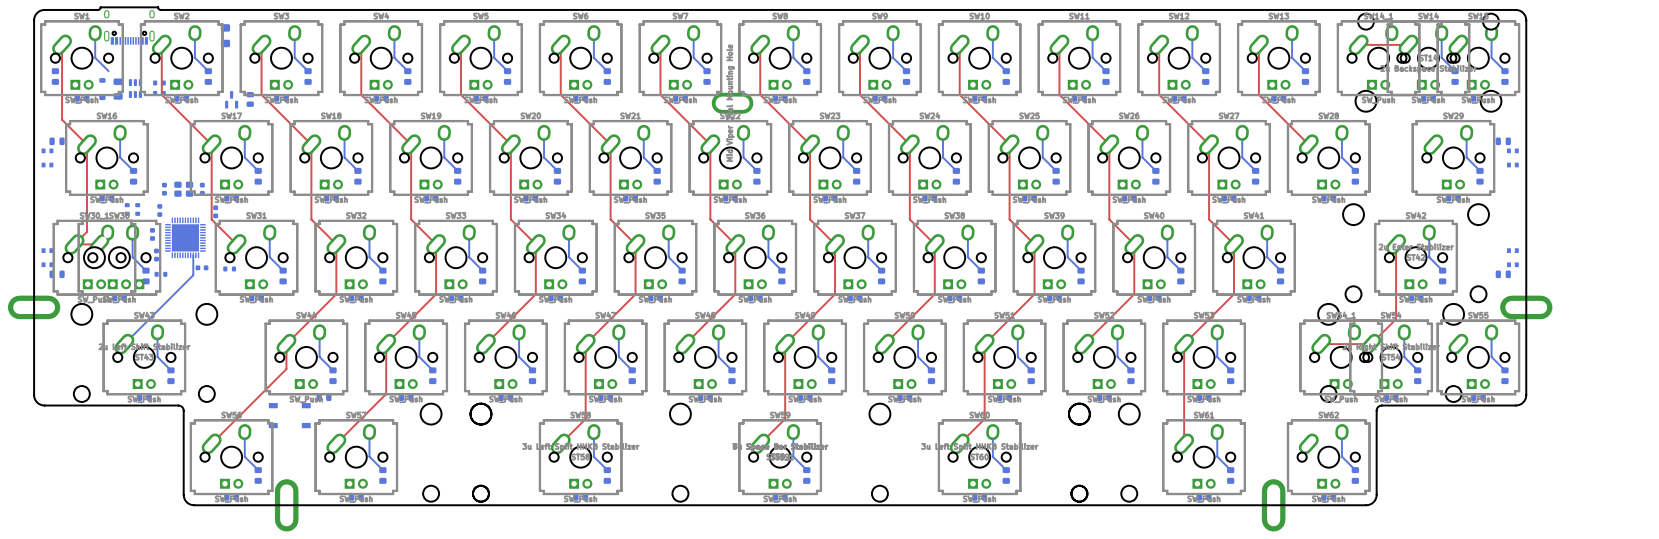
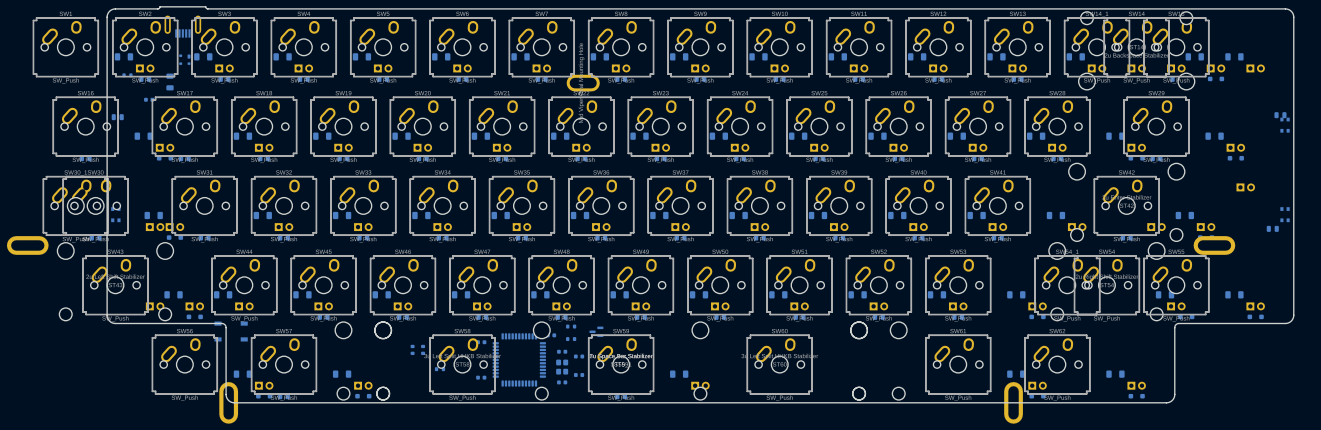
part footprint: [220, 24, 231, 48] -> [164, 15, 202, 38]
part: (129, 27) -> none
bottom track: (95, 33) (95, 57) (108, 71) -> none
bottom track: (194, 33) (194, 57) (208, 71) -> none
bottom track: (294, 33) (294, 57) (308, 71) -> none
bottom track: (394, 33) (394, 57) (407, 71) -> none
bottom track: (494, 33) (494, 57) (507, 71) -> none
bottom track: (593, 33) (593, 57) (607, 71) -> none
bottom track: (693, 33) (693, 57) (707, 71) -> none
bottom track: (793, 33) (793, 57) (806, 71) -> none
bottom track: (893, 33) (893, 57) (906, 71) -> none
bottom track: (992, 33) (992, 57) (1006, 71) -> none
bottom track: (1092, 33) (1092, 57) (1106, 71) -> none
bottom track: (1192, 33) (1192, 57) (1205, 71) -> none
bottom track: (1292, 33) (1292, 57) (1305, 71) -> none
bottom track: (1441, 33) (1441, 57) (1455, 71) -> none
bottom track: (1491, 33) (1491, 57) (1504, 71) -> none
top track: (62, 44) (62, 119) (86, 144) (86, 231) (74, 244) (99, 244) -> none
top track: (161, 44) (161, 94) (211, 144) (211, 219) (236, 244) -> none
top track: (261, 44) (261, 94) (311, 144) (311, 219) (336, 244) (336, 294) (286, 344) (286, 369) (211, 443) -> none
top track: (361, 44) (361, 94) (411, 144) (411, 219) (436, 244) (436, 294) (386, 344) (386, 393) (336, 443) -> none
top track: (461, 44) (461, 94) (510, 144) (510, 219) (535, 244) (535, 294) (485, 344) -> none
top track: (560, 44) (560, 94) (610, 144) (610, 219) (635, 244) (635, 294) (585, 344) (585, 418) (560, 443) -> none
top track: (660, 44) (660, 94) (710, 144) (710, 219) (735, 244) (735, 294) (685, 344) -> none
top track: (760, 44) (760, 94) (810, 144) (810, 219) (835, 244) (835, 294) (785, 344) (785, 418) (760, 443) -> none
top track: (859, 44) (859, 94) (909, 144) (909, 219) (934, 244) (934, 294) (884, 344) -> none
top track: (959, 44) (959, 94) (1009, 144) (1009, 219) (1034, 244) (1034, 294) (984, 344) (984, 418) (959, 443) -> none
top track: (1059, 44) (1059, 94) (1109, 144) (1109, 219) (1134, 244) (1134, 294) (1084, 344) -> none
top track: (1159, 44) (1159, 94) (1209, 144) (1209, 219) (1234, 244) (1234, 294) (1184, 344) (1184, 443) -> none
top track: (1258, 44) (1258, 94) (1308, 144) -> none
top track: (1358, 44) (1408, 44) -> none
part: none -> (123, 56)
part: none -> (203, 56)
part: none -> (282, 56)
part: none -> (361, 56)
part: none -> (441, 56)
part: none -> (520, 56)
part: none -> (599, 56)
part: none -> (679, 56)
part: none -> (758, 56)
part: none -> (837, 56)
part: none -> (917, 56)
part: none -> (996, 56)
part: none -> (1075, 56)
part: none -> (1194, 56)
part: none -> (1234, 56)
part: none -> (184, 59)
part: (55, 76) -> none
part: (208, 76) -> none
part: (308, 76) -> none
part: (407, 76) -> none
part: (507, 76) -> none
part: (607, 76) -> none
part: (707, 76) -> none
part: (806, 76) -> none
part: (906, 76) -> none
part: (1006, 76) -> none
part: (1106, 76) -> none
part: (1205, 76) -> none
part: (1305, 76) -> none
part: (1455, 76) -> none
part: (1504, 76) -> none
part: (159, 82) -> none
part: (82, 84) -> none
part: none -> (1216, 68)
part: none -> (1255, 68)
part: (135, 88) -> none
part: (102, 89) -> none
part position: (118, 89) -> (169, 81)
part: none -> (1216, 78)
part: (82, 98) -> none
part: (1428, 98) -> none
part: (231, 99) -> none
part: (250, 99) -> none
part: none -> (149, 99)
bottom track: (120, 132) (120, 157) (133, 170) -> none
bottom track: (244, 132) (244, 157) (258, 170) -> none
bottom track: (344, 132) (344, 157) (357, 170) -> none
bottom track: (444, 132) (444, 157) (457, 170) -> none
bottom track: (544, 132) (544, 157) (557, 170) -> none
bottom track: (643, 132) (643, 157) (657, 170) -> none
bottom track: (743, 132) (743, 157) (756, 170) -> none
bottom track: (843, 132) (843, 157) (856, 170) -> none
bottom track: (942, 132) (942, 157) (956, 170) -> none
bottom track: (1042, 132) (1042, 157) (1056, 170) -> none
bottom track: (1142, 132) (1142, 157) (1155, 170) -> none
bottom track: (1242, 132) (1242, 157) (1255, 170) -> none
bottom track: (1341, 132) (1341, 157) (1355, 170) -> none
bottom track: (1466, 132) (1466, 157) (1480, 170) -> none
part: (57, 141) -> none
part: (1503, 141) -> none
part: none -> (1280, 115)
part: none -> (117, 117)
part: none -> (1285, 125)
part: (47, 157) -> none
part: (1512, 157) -> none
part: none -> (143, 136)
part: none -> (242, 136)
part: none -> (322, 136)
part: none -> (401, 136)
part: none -> (480, 136)
part: none -> (560, 136)
part: none -> (639, 136)
part: none -> (718, 136)
part: none -> (798, 136)
part: none -> (877, 136)
part: none -> (956, 136)
part: none -> (1036, 136)
part: none -> (1115, 136)
part: none -> (1214, 136)
part: (133, 176) -> none
part: (258, 176) -> none
part: (357, 176) -> none
part: (457, 176) -> none
part: (557, 176) -> none
part: (657, 176) -> none
part: (756, 176) -> none
part: (856, 176) -> none
part: (956, 176) -> none
part: (1056, 176) -> none
part: (1155, 176) -> none
part: (1255, 176) -> none
part: (1355, 176) -> none
part: (1480, 176) -> none
part: (106, 184) -> none
part position: (231, 184) -> (165, 147)
part position: (1453, 184) -> (1136, 147)
part: none -> (1235, 147)
part: (164, 189) -> none
part: (183, 189) -> none
part: (202, 189) -> none
part: none -> (165, 158)
part: none -> (1136, 158)
part: none -> (1235, 158)
part: (127, 209) -> none
part: (137, 209) -> none
part: (159, 210) -> none
part: (215, 211) -> none
bottom track: (132, 232) (132, 257) (146, 270) -> none
bottom track: (269, 232) (269, 257) (283, 270) -> none
bottom track: (369, 232) (369, 257) (382, 270) -> none
bottom track: (469, 232) (469, 257) (482, 270) -> none
bottom track: (568, 232) (568, 257) (582, 270) -> none
bottom track: (668, 232) (668, 257) (682, 270) -> none
bottom track: (768, 232) (768, 257) (781, 270) -> none
bottom track: (868, 232) (868, 257) (881, 270) -> none
bottom track: (967, 232) (967, 257) (981, 270) -> none
bottom track: (1067, 232) (1067, 257) (1081, 270) -> none
bottom track: (1167, 232) (1167, 257) (1180, 270) -> none
bottom track: (1267, 232) (1267, 257) (1280, 270) -> none
bottom track: (1429, 232) (1429, 257) (1442, 270) -> none
part: (152, 234) -> none
part: none -> (1245, 187)
part: (185, 237) -> none
top track: (1396, 244) (1396, 319) (1371, 344) (1321, 344) -> none
part: (156, 255) -> none
bottom track: (193, 255) (193, 275) (124, 344) -> none
drawing position: (780, 256) -> (700, 204)
part: (47, 257) -> none
part: (1512, 257) -> none
part: (202, 267) -> none
part: none -> (115, 214)
part: (229, 268) -> none
part: none -> (1285, 214)
part: none -> (153, 215)
part: none -> (262, 215)
part: none -> (342, 215)
part: none -> (421, 215)
part: none -> (500, 215)
part: none -> (580, 215)
part: none -> (659, 215)
part: none -> (738, 215)
part: none -> (818, 215)
part: none -> (897, 215)
part: none -> (976, 215)
part: none -> (1055, 215)
part: none -> (1184, 215)
part: (57, 274) -> none
part: (160, 274) -> none
part: (1503, 274) -> none
part: (146, 276) -> none
part: (283, 276) -> none
part: (382, 276) -> none
part: (482, 276) -> none
part: (582, 276) -> none
part: (682, 276) -> none
part: (781, 276) -> none
part: (881, 276) -> none
part: (981, 276) -> none
part: (1081, 276) -> none
part: (1180, 276) -> none
part: (1280, 276) -> none
part: (1442, 276) -> none
part: (94, 284) -> none
part: (119, 284) -> none
part: (139, 284) -> none
part: none -> (155, 227)
part: none -> (174, 227)
part: (256, 284) -> none
part: none -> (1077, 227)
part: (1416, 284) -> none
part: none -> (1156, 227)
part: none -> (1206, 227)
part: none -> (1272, 228)
part: none -> (174, 237)
part: none -> (1206, 237)
bottom track: (157, 332) (157, 356) (170, 370) -> none
bottom track: (319, 332) (319, 356) (333, 370) -> none
bottom track: (419, 332) (419, 356) (432, 370) -> none
bottom track: (519, 332) (519, 356) (532, 370) -> none
bottom track: (618, 332) (618, 356) (632, 370) -> none
bottom track: (718, 332) (718, 356) (731, 370) -> none
bottom track: (818, 332) (818, 356) (831, 370) -> none
bottom track: (918, 332) (918, 356) (931, 370) -> none
bottom track: (1017, 332) (1017, 356) (1031, 370) -> none
bottom track: (1117, 332) (1117, 356) (1130, 370) -> none
bottom track: (1217, 332) (1217, 356) (1230, 370) -> none
bottom track: (1404, 332) (1404, 356) (1417, 370) -> none
bottom track: (1491, 332) (1491, 356) (1504, 370) -> none
part: none -> (173, 294)
part: none -> (223, 294)
part: none -> (302, 294)
part: none -> (381, 294)
part: none -> (461, 294)
part: none -> (540, 294)
part: none -> (619, 294)
part: none -> (699, 294)
part: none -> (778, 294)
part: none -> (857, 294)
part: none -> (936, 294)
part: none -> (1016, 294)
part: none -> (1165, 294)
part: none -> (1234, 294)
part: (170, 375) -> none
part: (333, 375) -> none
part: (432, 375) -> none
part: (532, 375) -> none
part: (632, 375) -> none
part: (731, 375) -> none
part: (831, 375) -> none
part: (931, 375) -> none
part: (1031, 375) -> none
part: (1130, 375) -> none
part: (1230, 375) -> none
part: (1417, 375) -> none
part: (1504, 375) -> none
part: (144, 384) -> none
part: none -> (155, 306)
part: none -> (194, 306)
part position: (1341, 384) -> (1037, 306)
part: (1391, 384) -> none
part: none -> (1255, 306)
part: (144, 397) -> none
part: none -> (194, 316)
part: (324, 397) -> none
part: none -> (1037, 316)
part: (1391, 397) -> none
part: (1478, 397) -> none
part: none -> (1186, 316)
part: none -> (1255, 316)
part: none -> (571, 326)
part: none -> (596, 331)
part: none -> (551, 335)
part: none -> (571, 339)
part: none -> (481, 342)
bottom track: (244, 432) (244, 456) (258, 470) -> none
bottom track: (369, 432) (369, 456) (382, 470) -> none
bottom track: (593, 432) (593, 456) (607, 470) -> none
bottom track: (793, 432) (793, 456) (806, 470) -> none
bottom track: (992, 432) (992, 456) (1006, 470) -> none
bottom track: (1217, 432) (1217, 456) (1230, 470) -> none
bottom track: (1341, 432) (1341, 456) (1355, 470) -> none
part: none -> (412, 349)
part: none -> (423, 349)
part: none -> (562, 351)
part: none -> (579, 356)
part: none -> (519, 359)
part: none -> (562, 367)
part: none -> (440, 369)
part footprint: [603, 467, 611, 484] -> [476, 375, 487, 380]
part: none -> (242, 374)
part: none -> (342, 374)
part: none -> (679, 374)
part: none -> (1016, 374)
part: none -> (1115, 374)
part: none -> (579, 375)
part: (258, 475) -> none
part: (382, 475) -> none
part: (806, 475) -> none
part: (1006, 475) -> none
part: (1230, 475) -> none
part: (1355, 475) -> none
part: none -> (562, 382)
part: (231, 483) -> none
part position: (356, 483) -> (264, 385)
part: none -> (363, 385)
part: (580, 483) -> none
part: (780, 483) -> none
part: none -> (700, 385)
part: (979, 483) -> none
part: (1204, 483) -> none
part position: (1328, 483) -> (1037, 385)
part: none -> (1136, 385)
part: none -> (264, 396)
part: none -> (363, 396)
part: none -> (1037, 396)
part: none -> (1136, 396)
part: (231, 497) -> none
part: (580, 497) -> none
part: (979, 497) -> none
part: (1204, 497) -> none
part: (1328, 497) -> none

